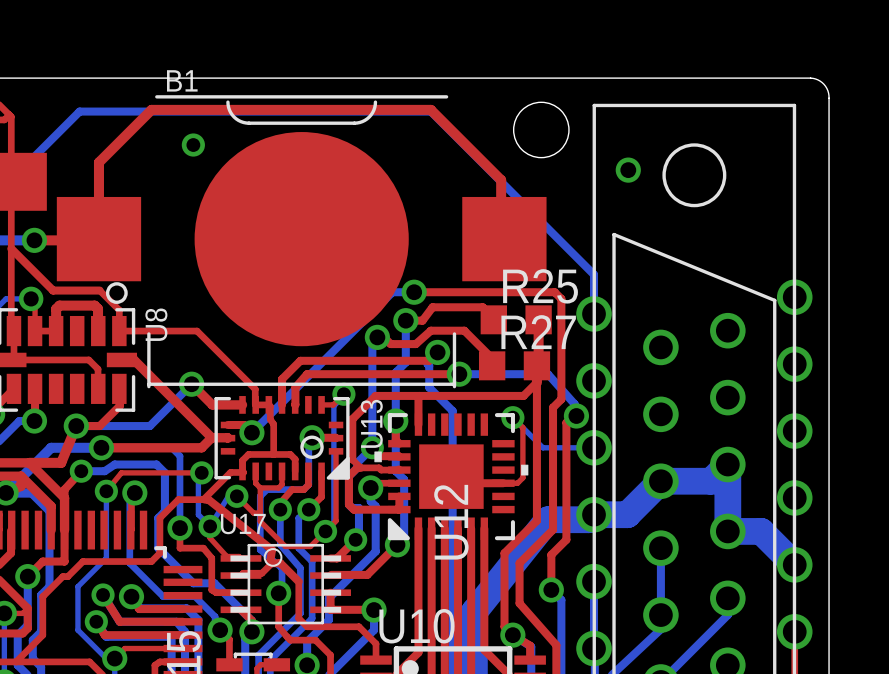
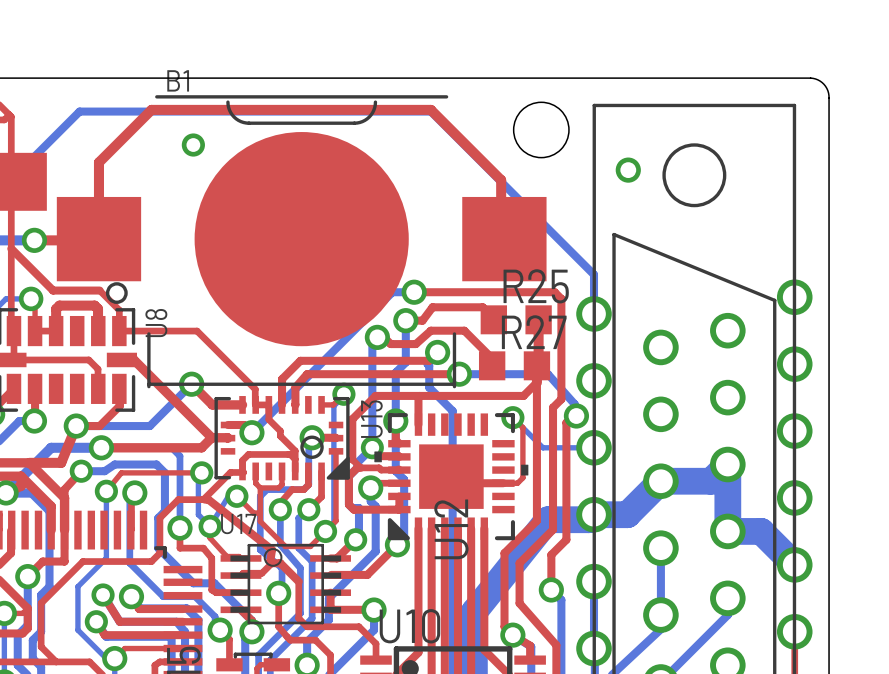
top track: (268, 404) (270, 419) (273, 424) (273, 454) -> (268, 404) (268, 419) (280, 431) (280, 436) (295, 450) (295, 459)
top track: (67, 576) (62, 576) (42, 596) (42, 635) (16, 661) -> (67, 576) (41, 603) (41, 646) (56, 661)

